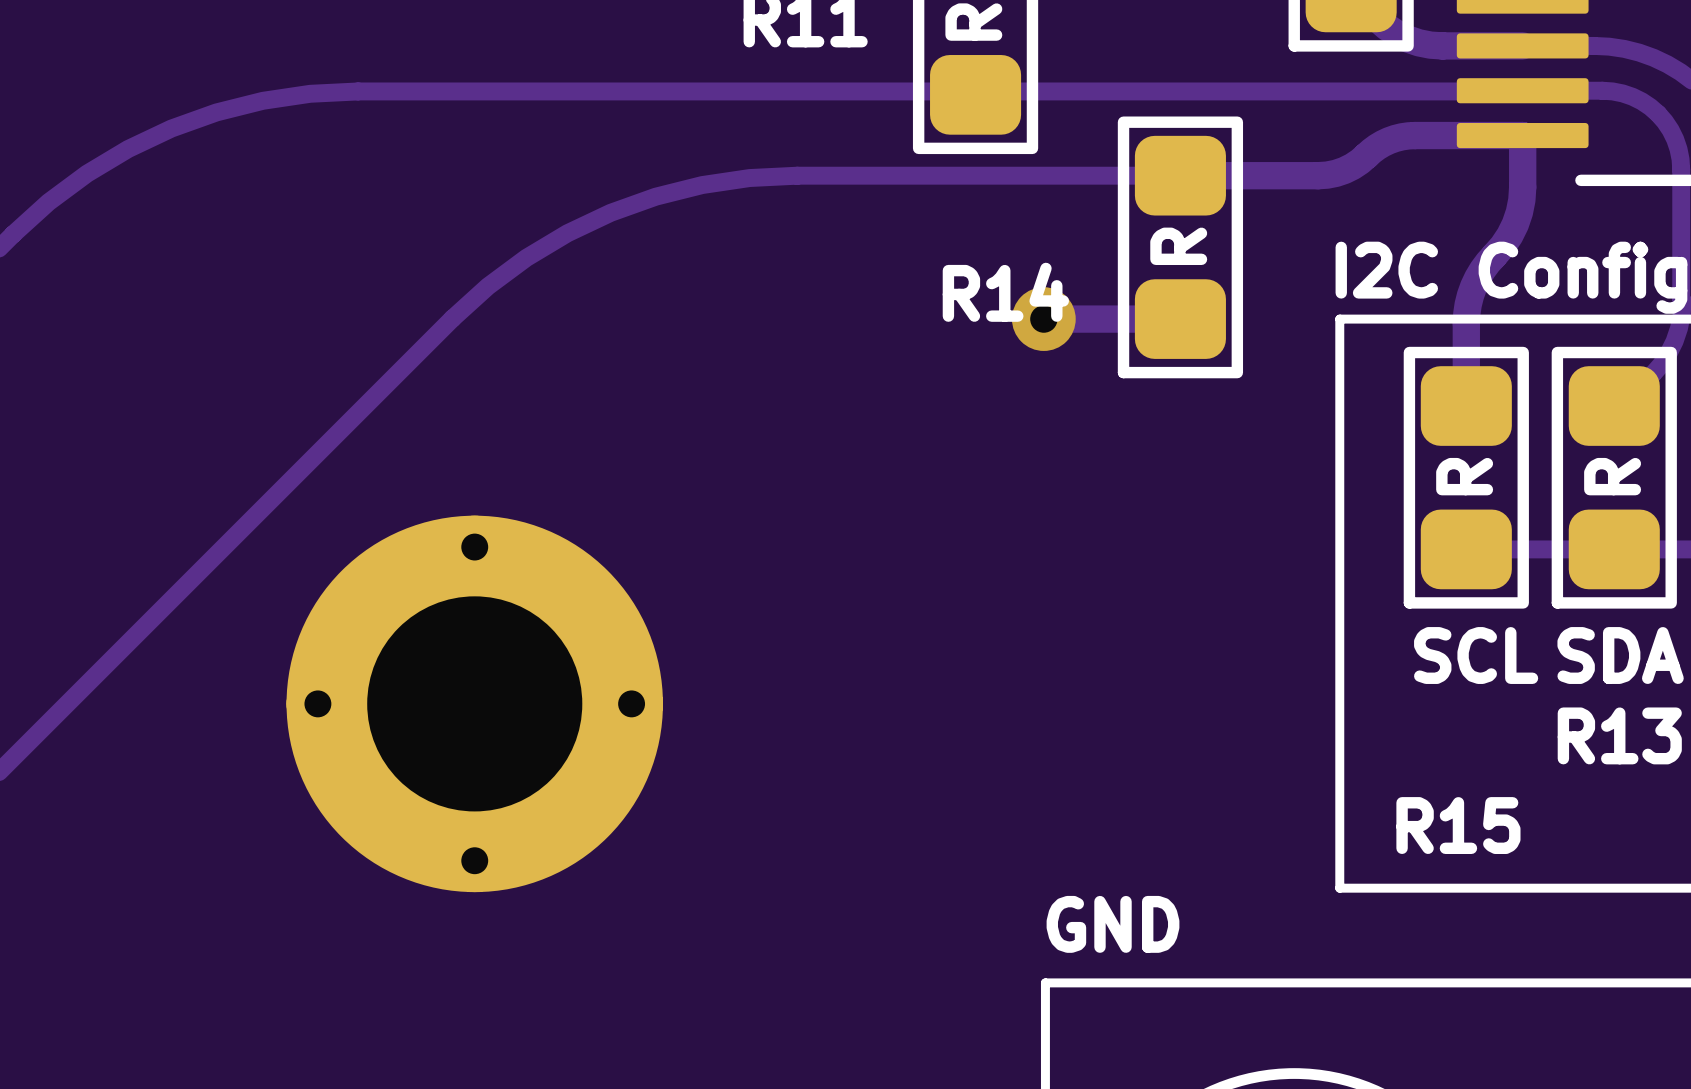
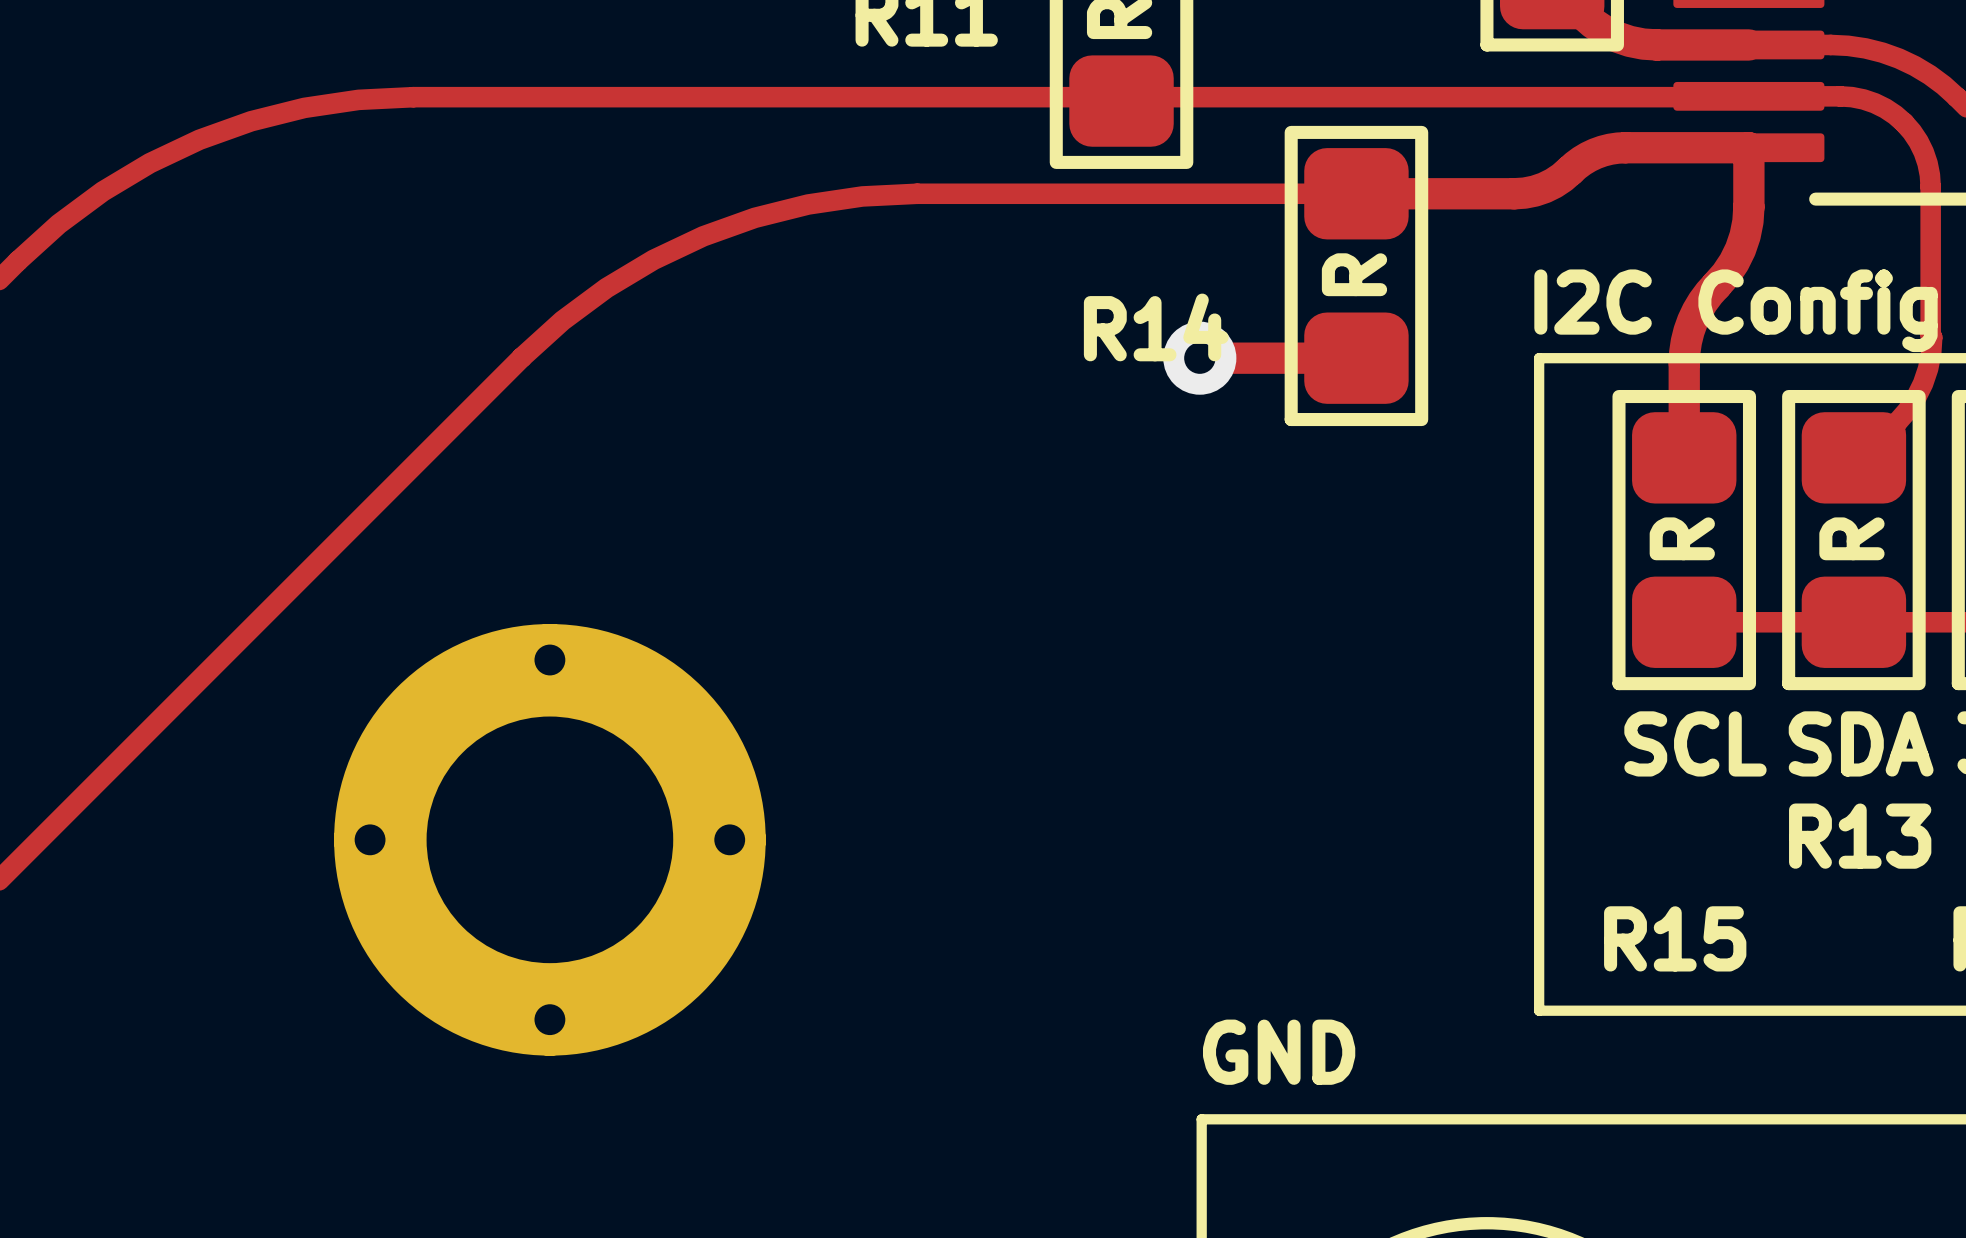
part position: (474, 703) -> (549, 839)

